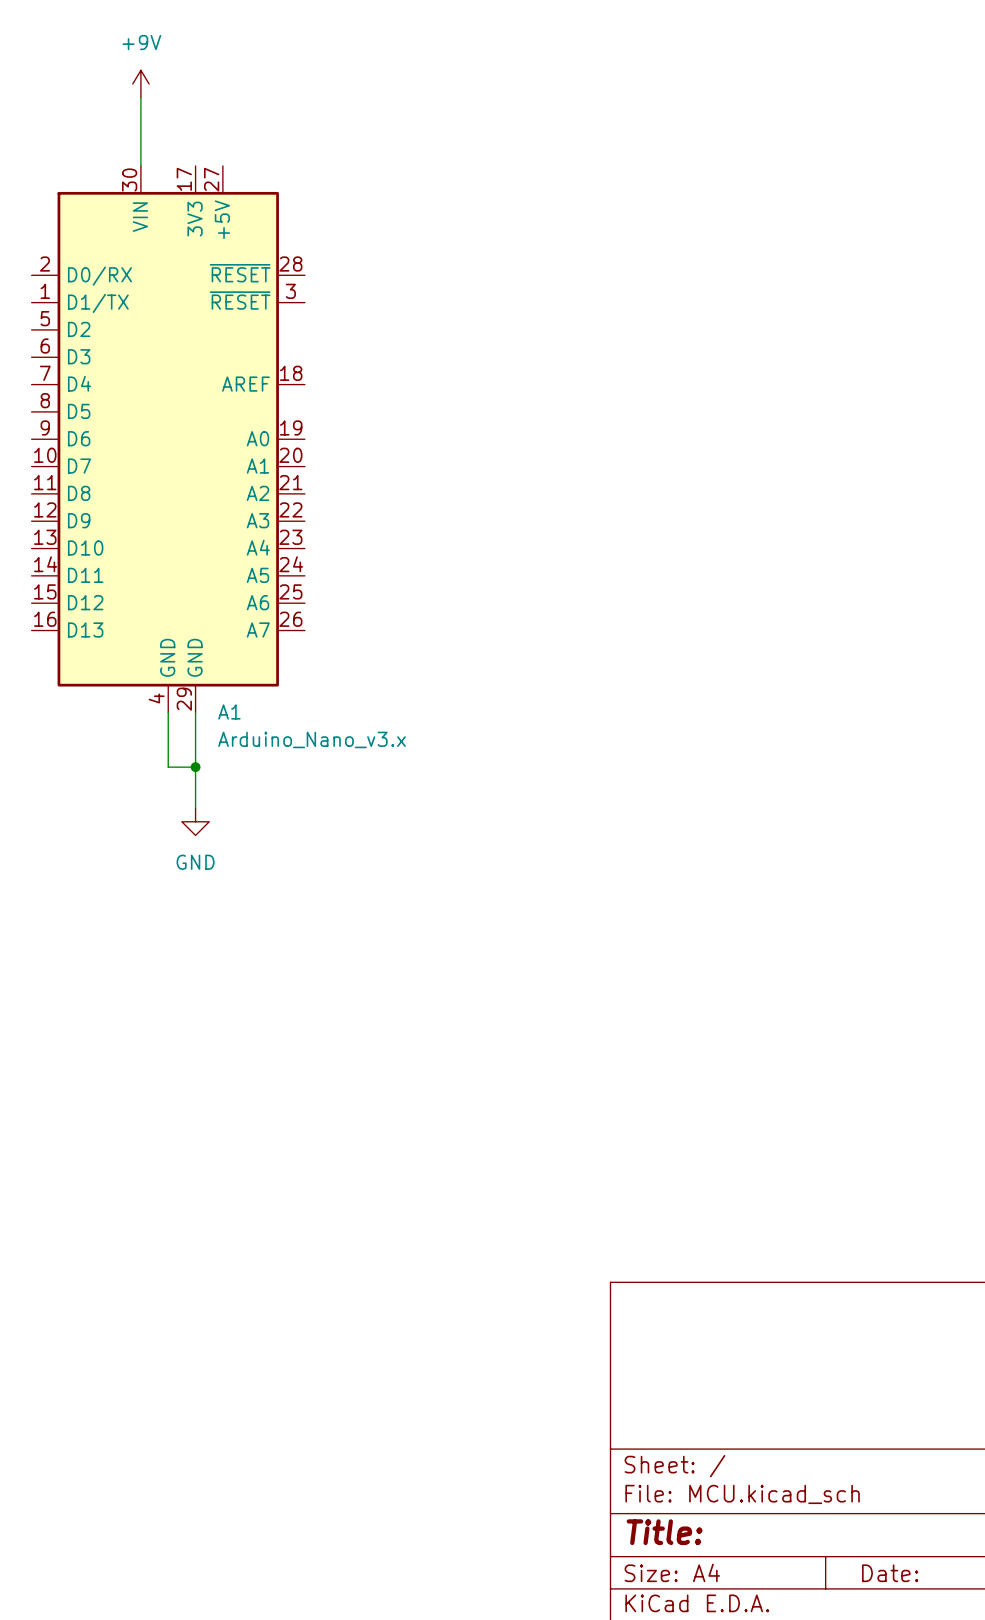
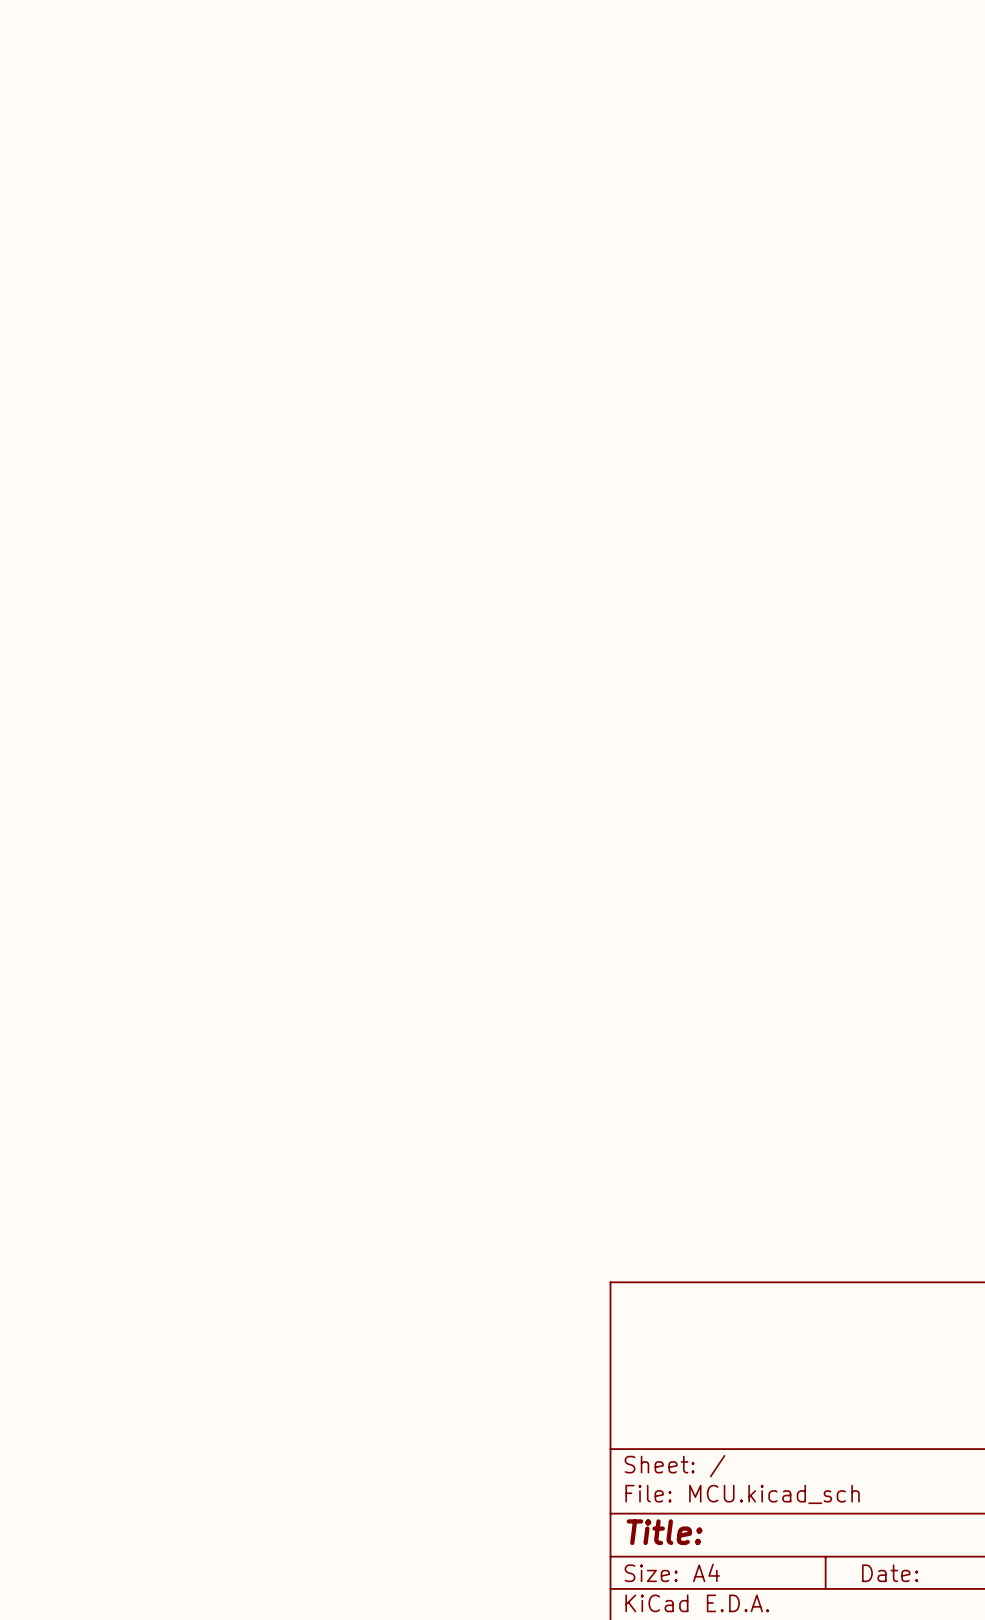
power symbol: +9V (140, 84) -> none
wire: (140, 97) (140, 165) -> none
A1: Arduino_Nano_v3.x (168, 439) -> none
wire: (168, 712) (168, 767) (195, 767) -> none
wire: (195, 712) (195, 808) -> none
junction: (195, 767) -> none
power symbol: GND (195, 821) -> none

